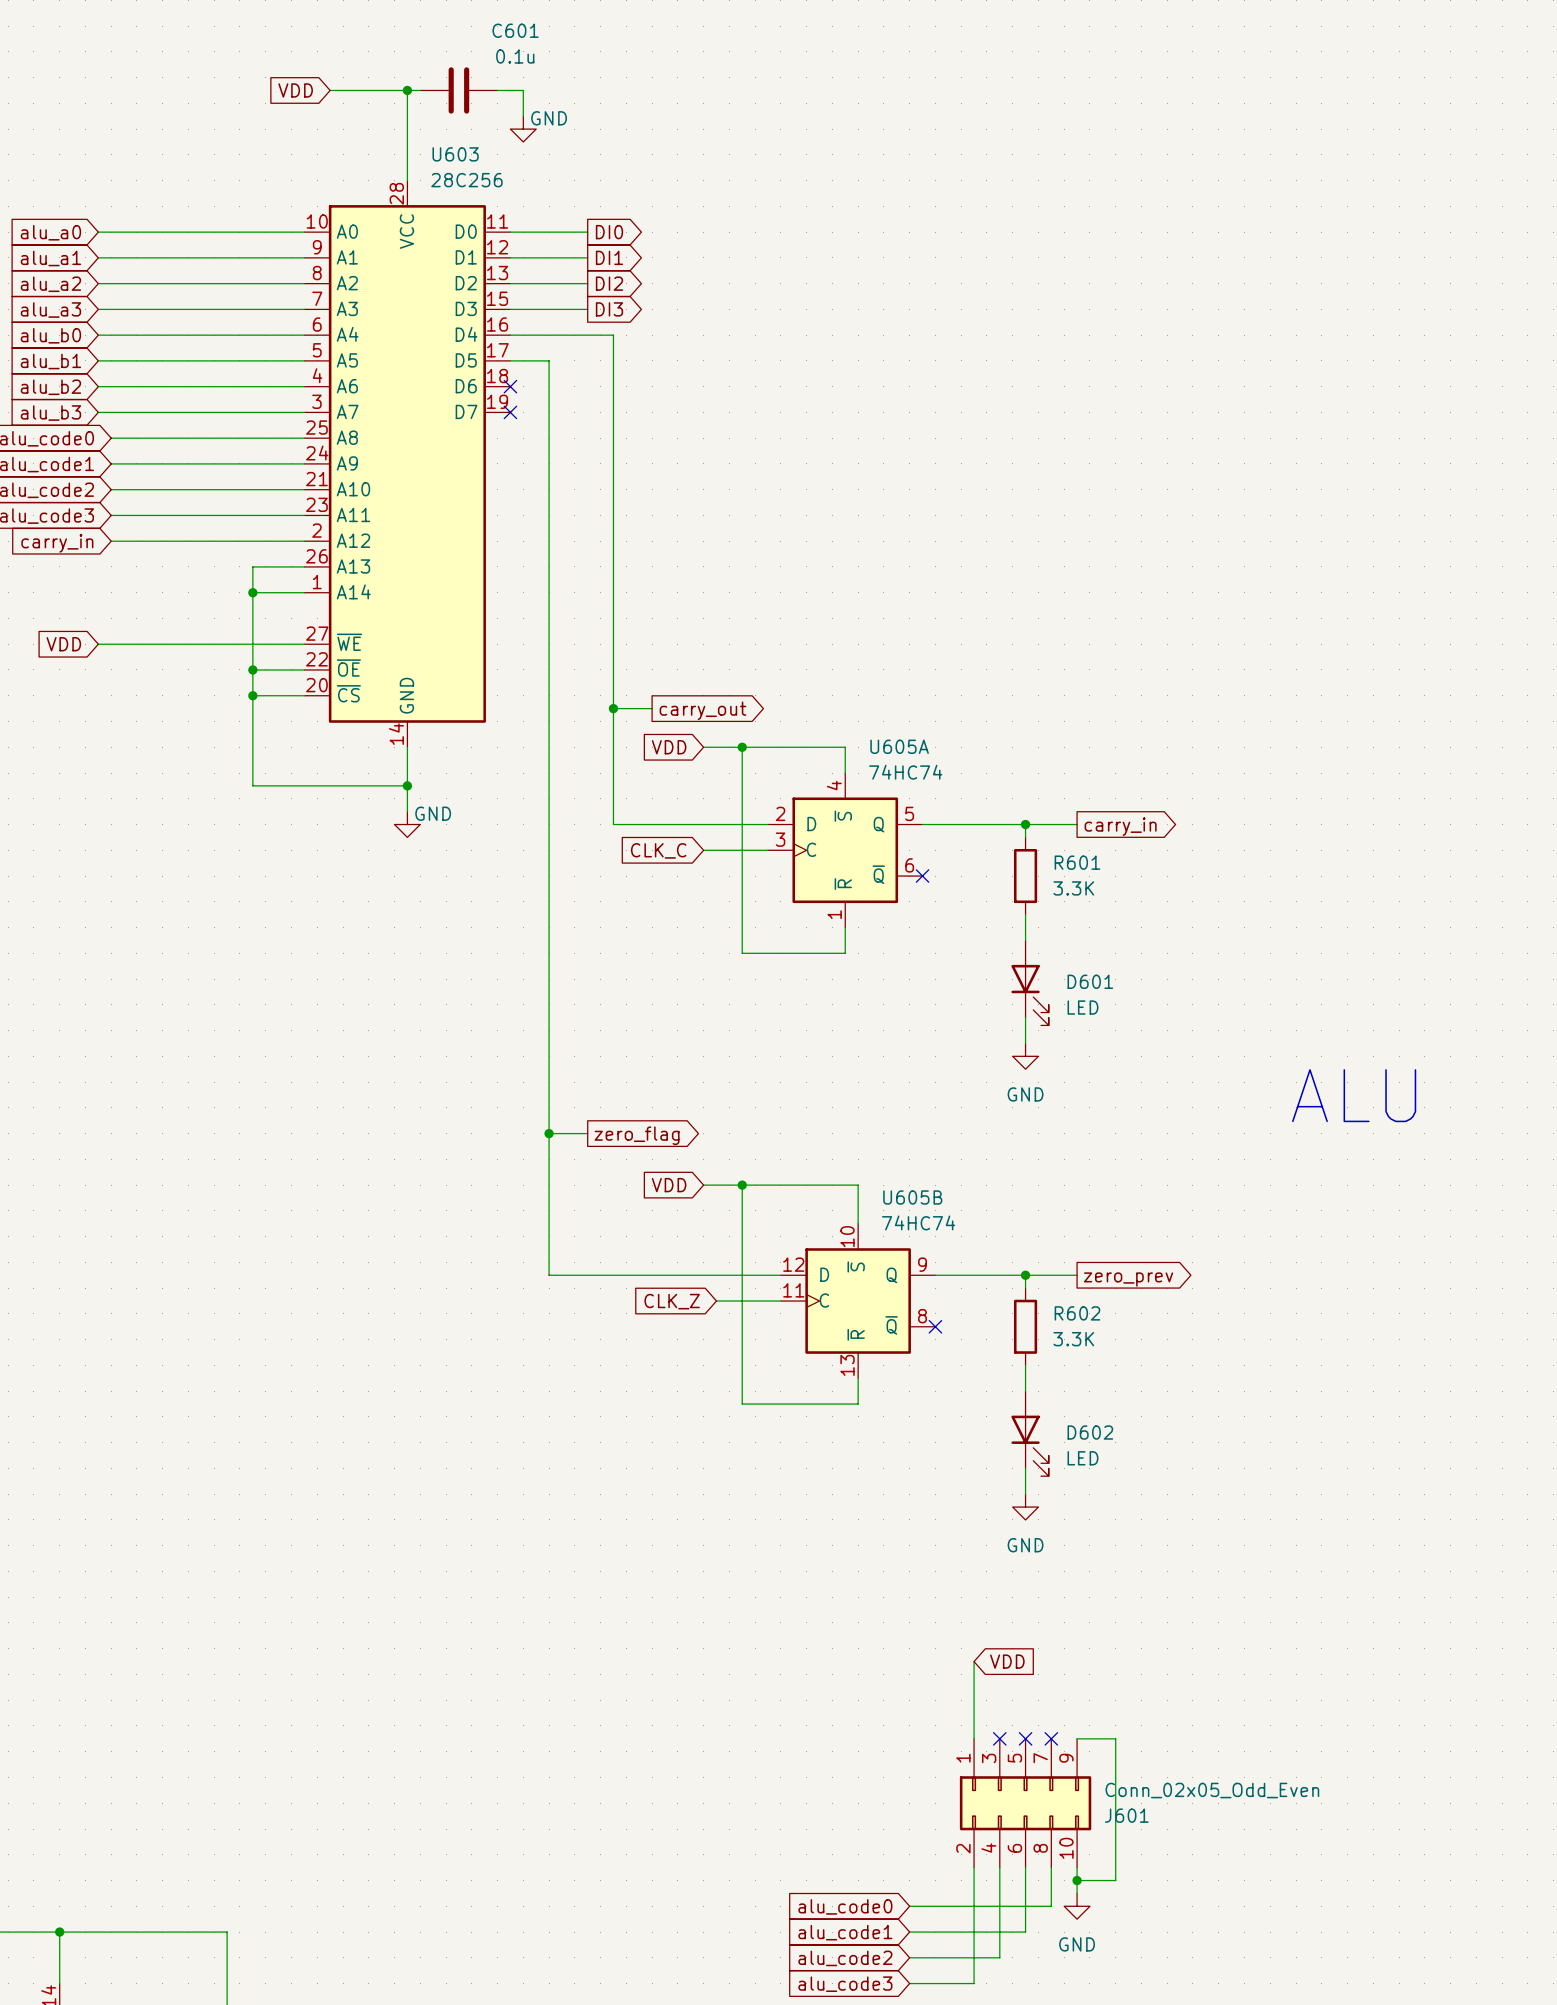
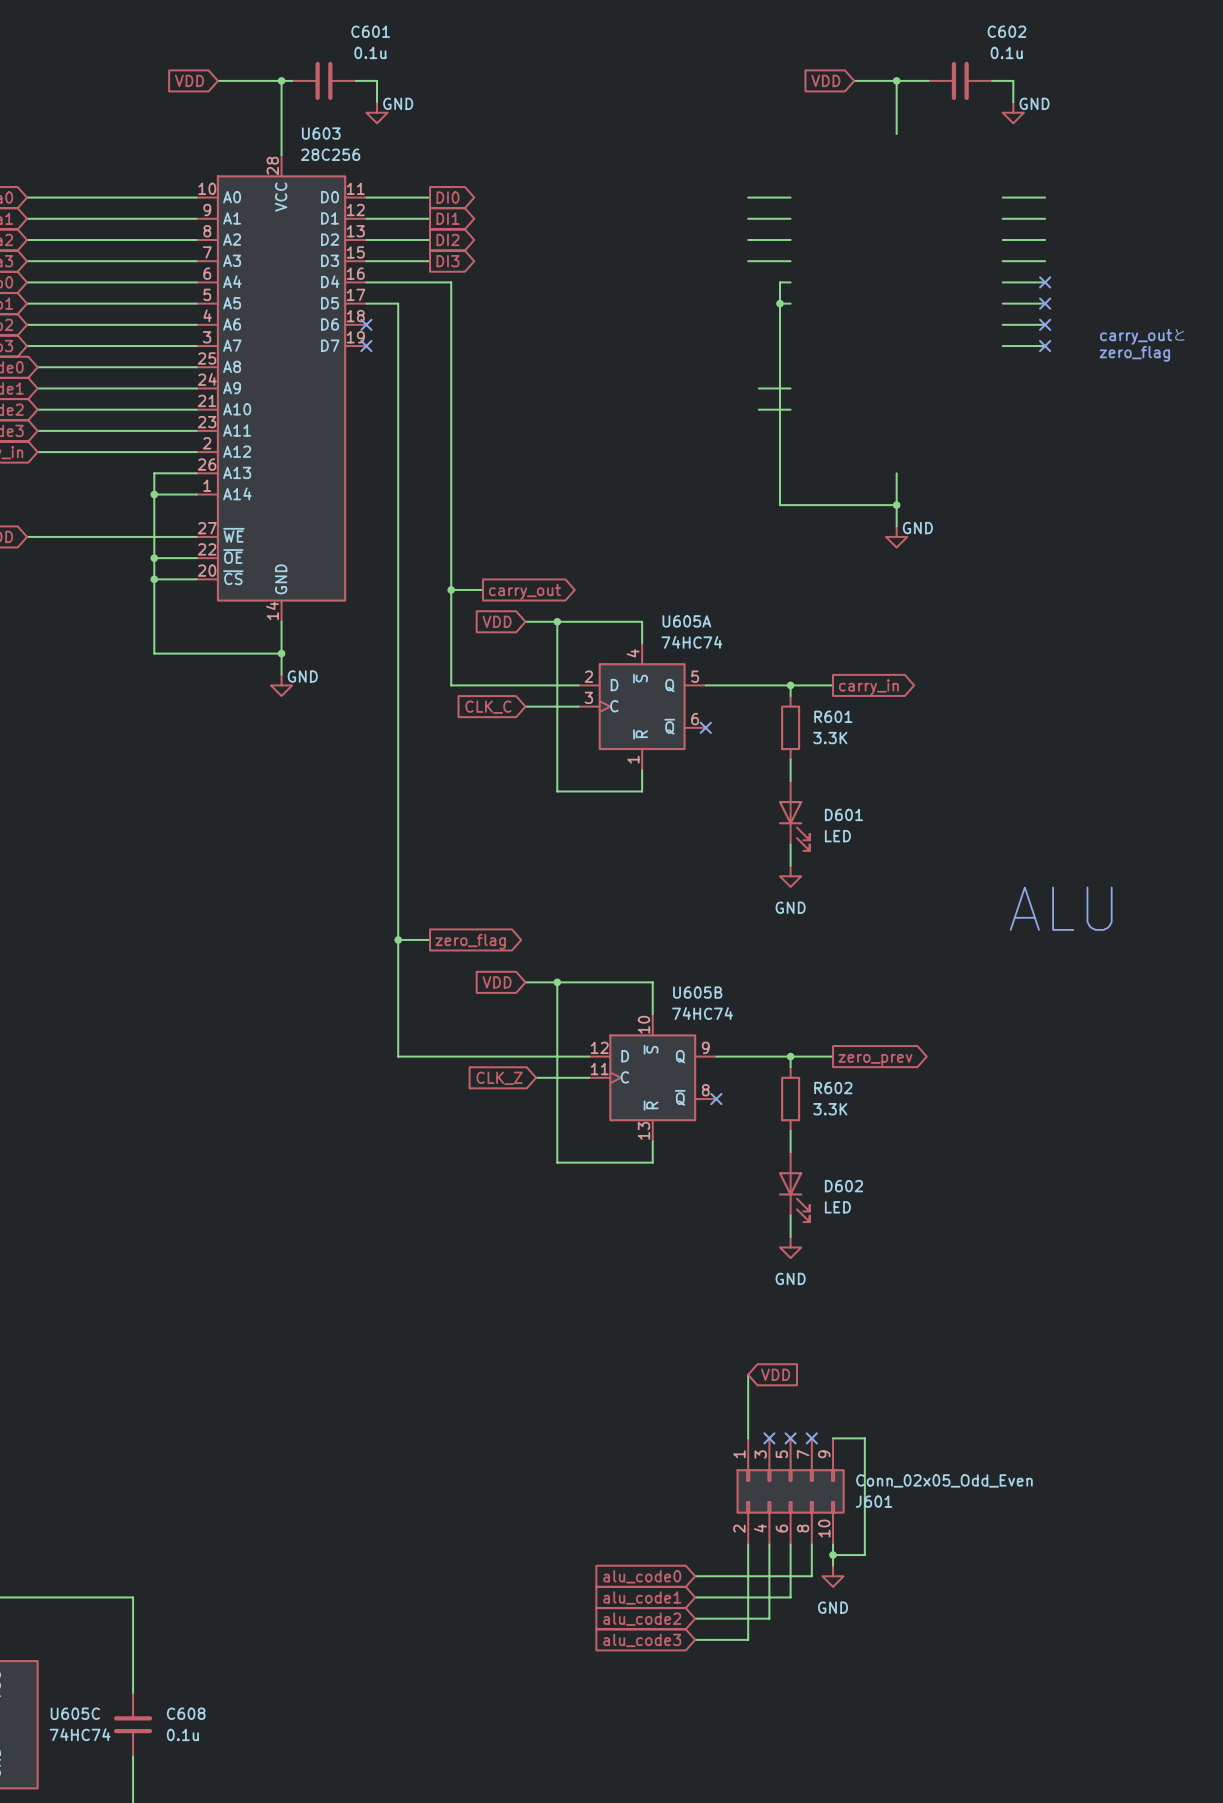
global label: none -> VDD (825, 80)
wire: none -> (854, 80) (928, 80)
wire: none -> (896, 80) (896, 133)
junction: none -> (896, 80)
C602: none -> 0.1u (960, 80)
wire: none -> (992, 80) (1013, 80) (1013, 102)
power symbol: none -> GND (1013, 112)
wire: none -> (748, 197) (790, 197)
wire: none -> (1002, 197) (1045, 197)
wire: none -> (748, 218) (790, 218)
wire: none -> (1002, 218) (1045, 218)
wire: none -> (748, 239) (790, 239)
wire: none -> (1002, 239) (1045, 239)
wire: none -> (748, 261) (790, 261)
wire: none -> (1002, 261) (1045, 261)
wire: none -> (790, 282) (780, 282) (780, 505) (896, 505)
wire: none -> (1002, 282) (1045, 282)
no-connect mark: none -> (1045, 282)
wire: none -> (780, 303) (790, 303)
junction: none -> (780, 303)
wire: none -> (1002, 303) (1045, 303)
no-connect mark: none -> (1045, 303)
wire: none -> (1002, 324) (1045, 324)
no-connect mark: none -> (1045, 324)
text: none -> carry_outと (1142, 336)
wire: none -> (1002, 346) (1045, 346)
no-connect mark: none -> (1045, 346)
text: none -> zero_flag (1134, 353)
wire: none -> (758, 388) (790, 388)
wire: none -> (758, 409) (790, 409)
wire: none -> (896, 473) (896, 526)
junction: none -> (896, 505)
power symbol: none -> GND (896, 536)

